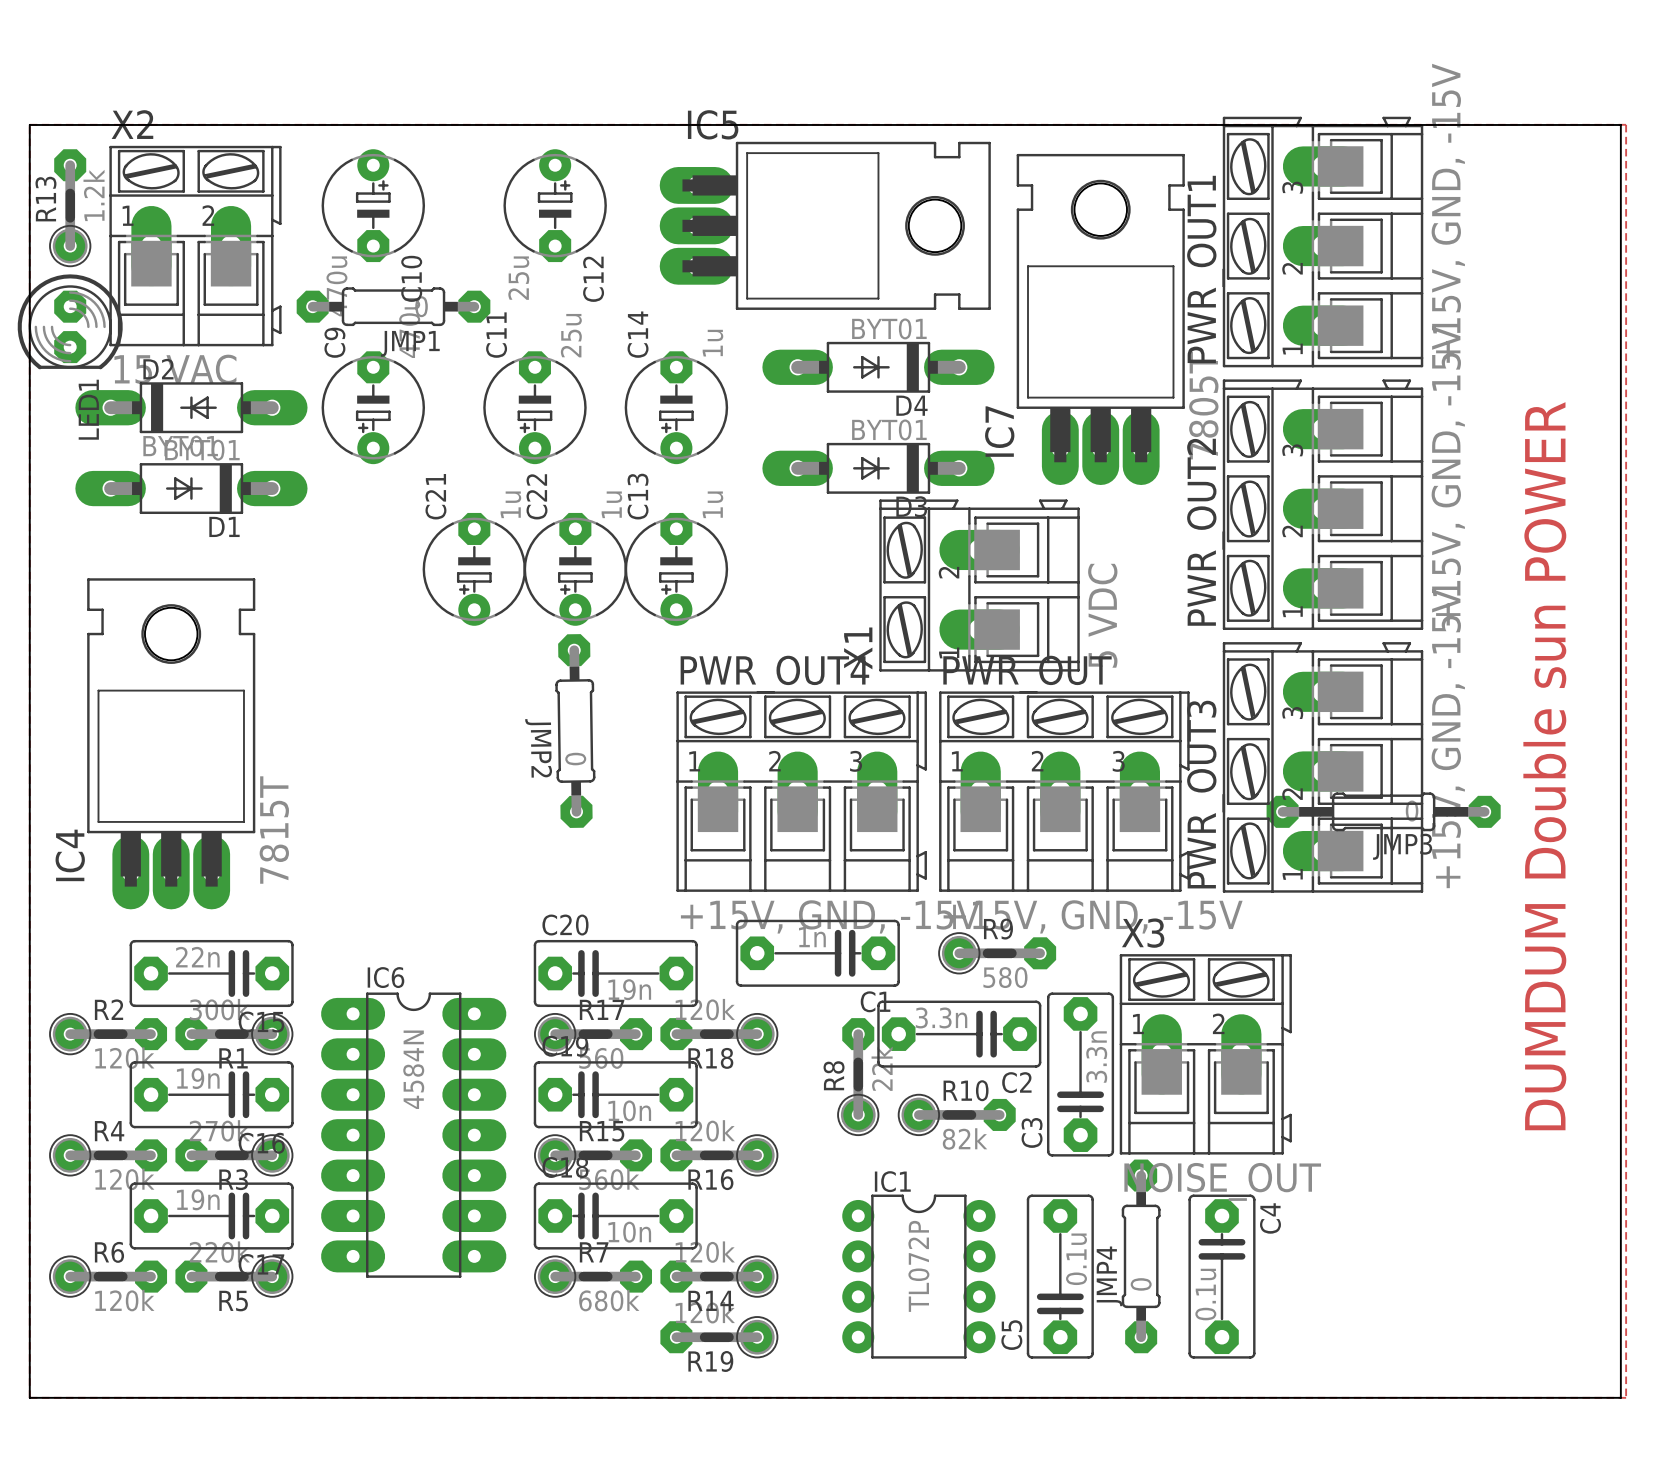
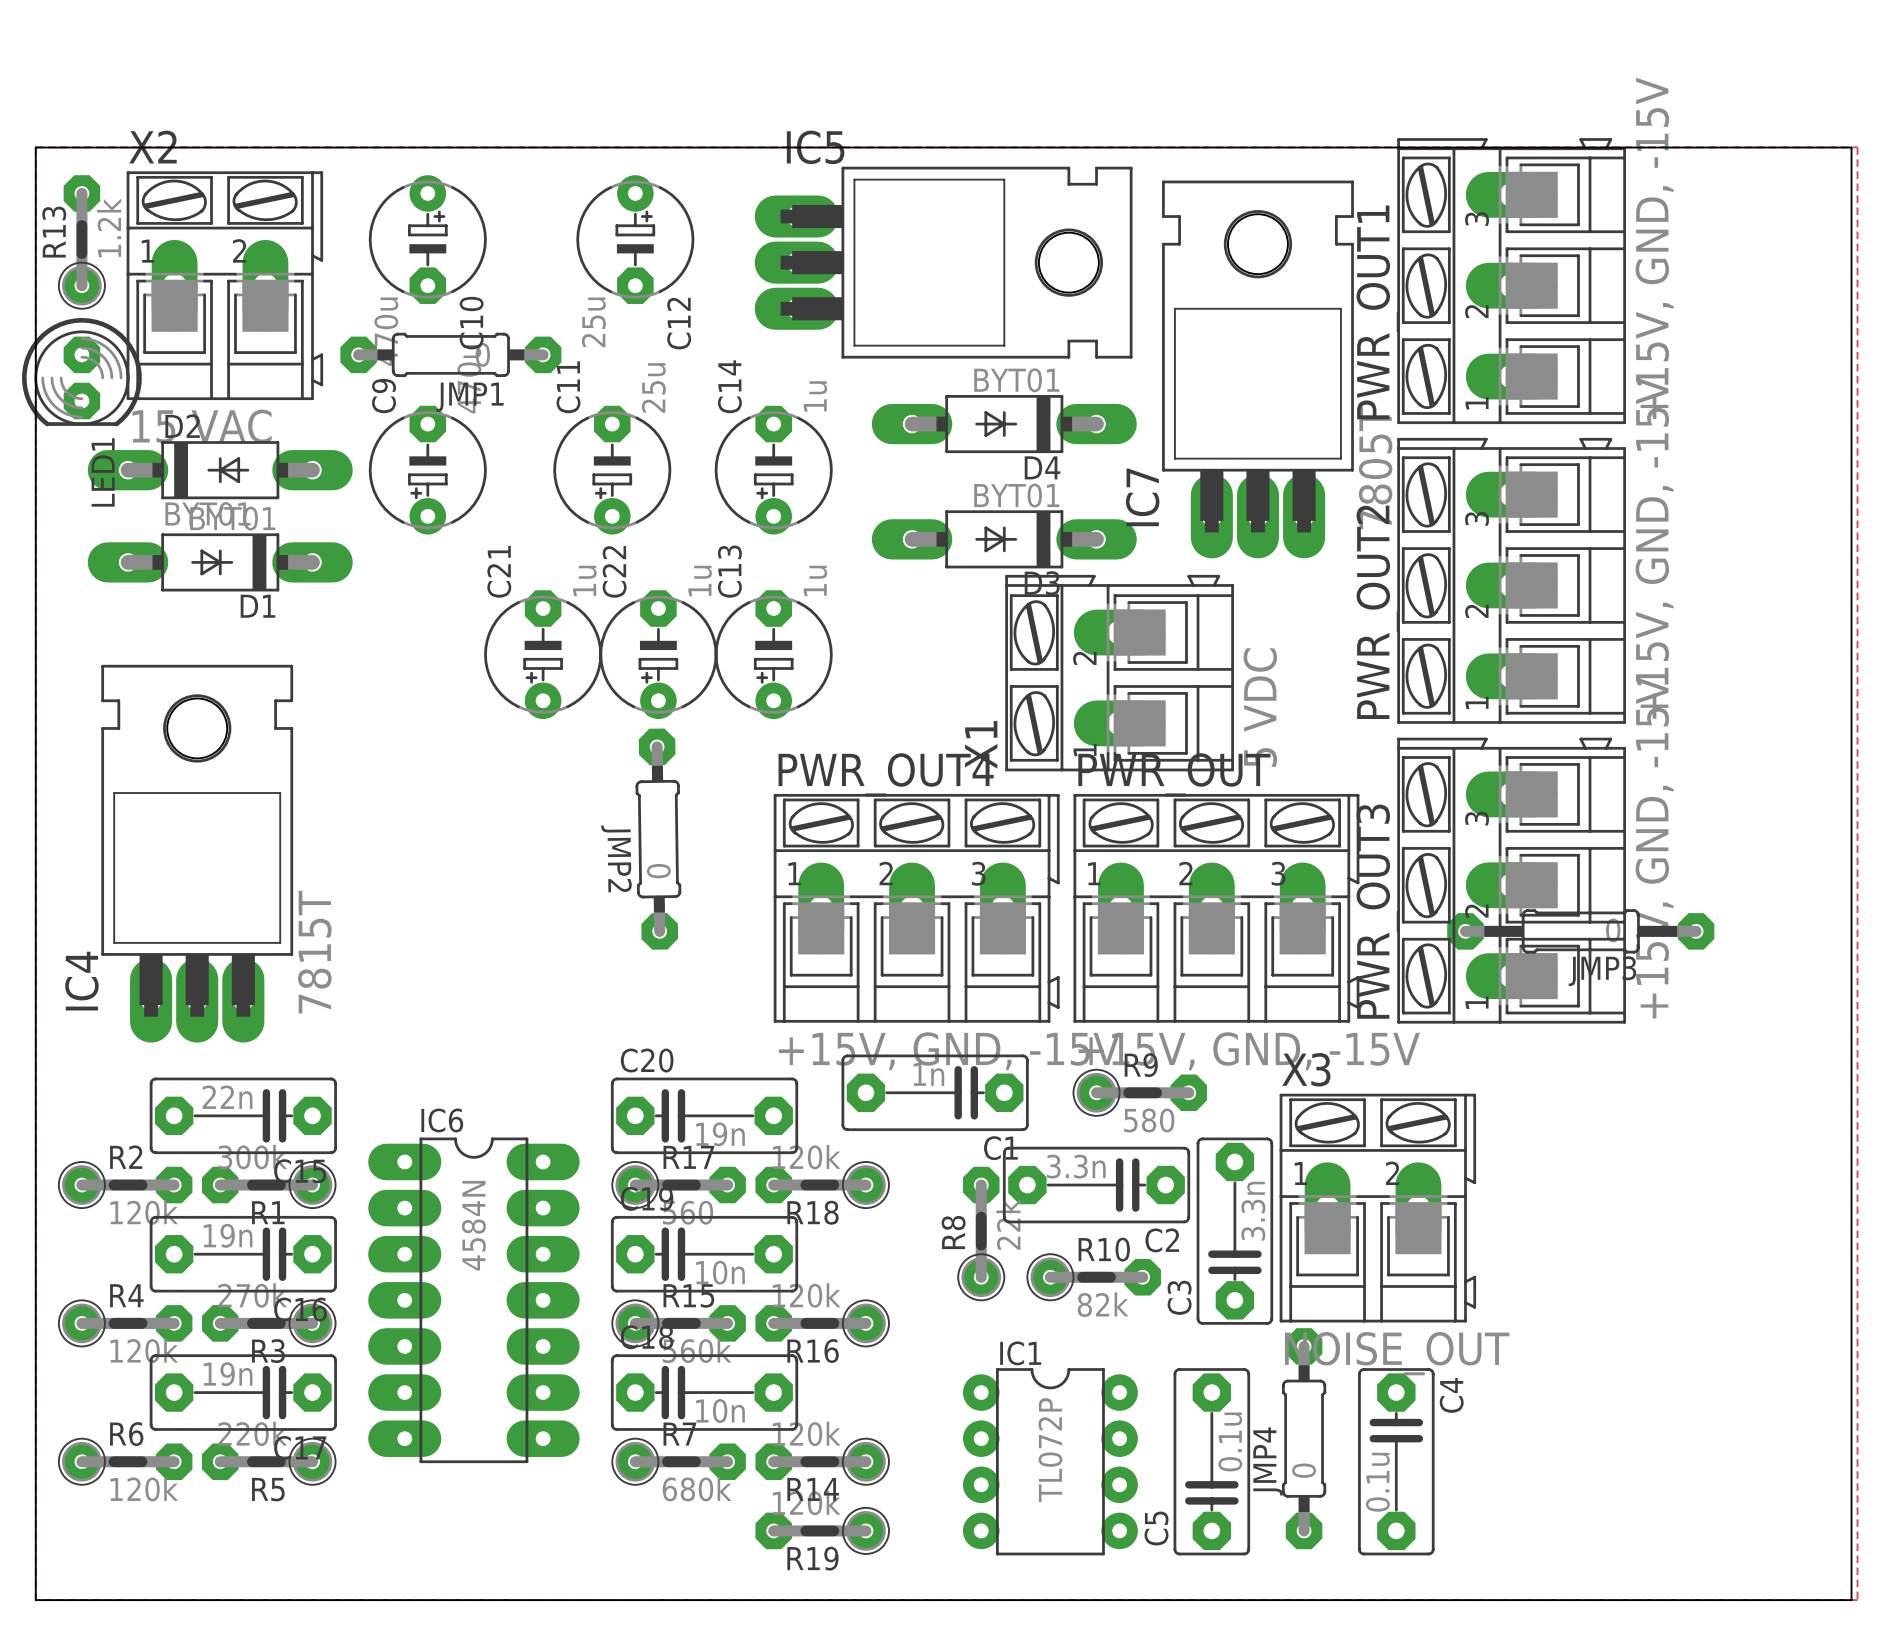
text: DUMDUM Double sun POWER (1544, 766) -> none

